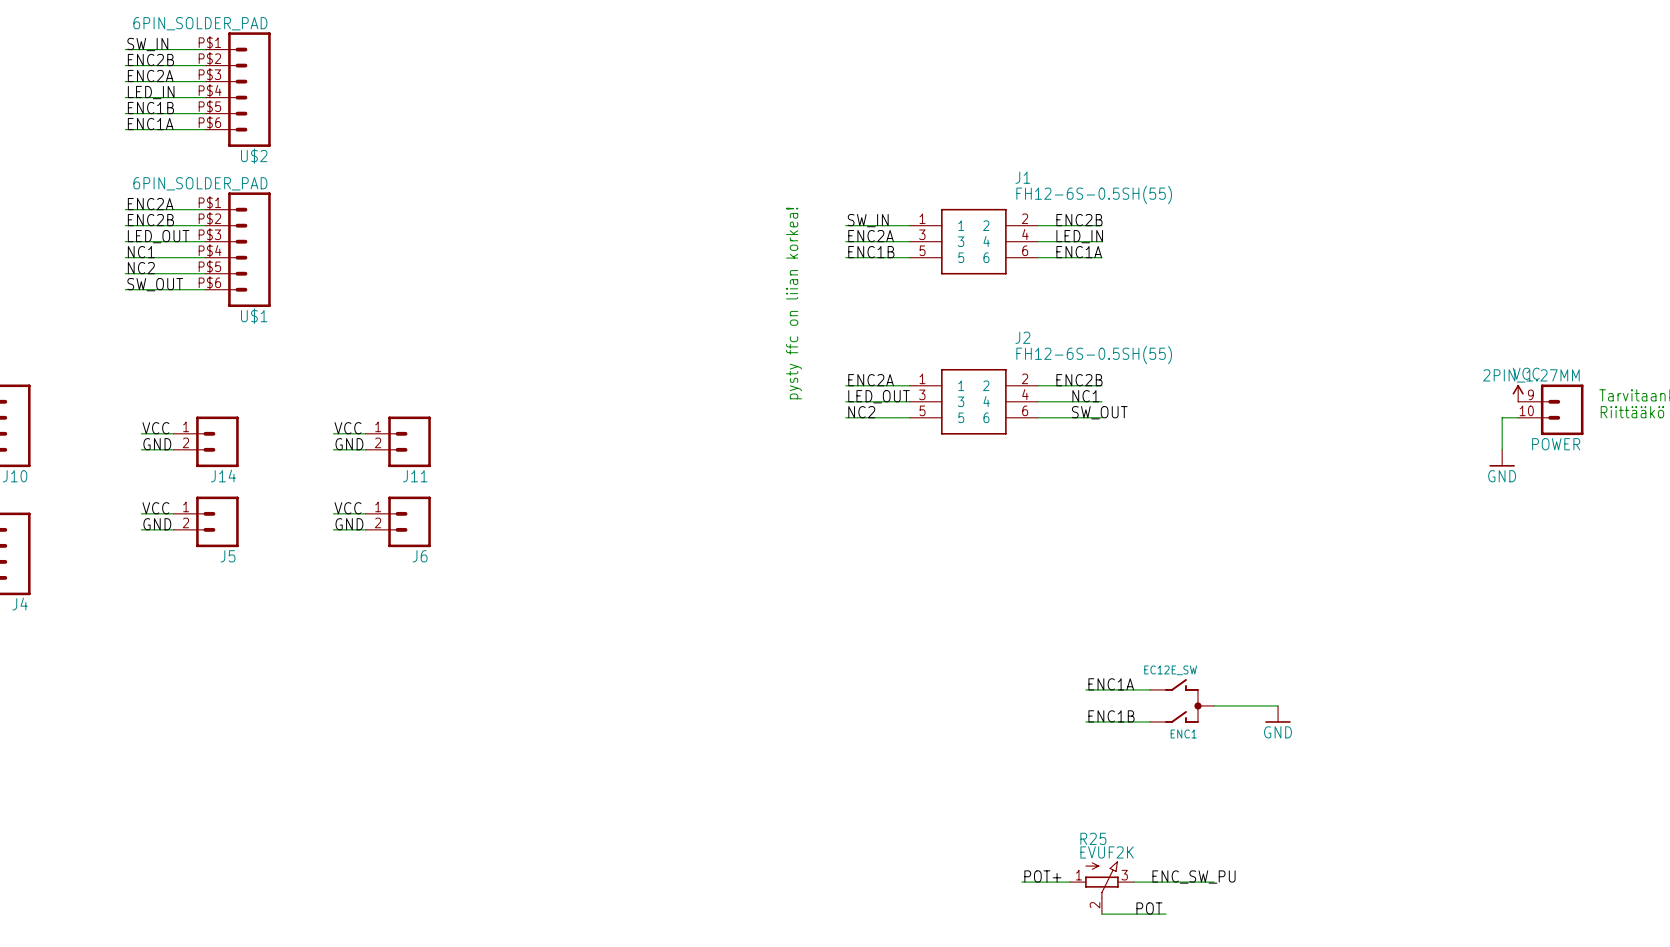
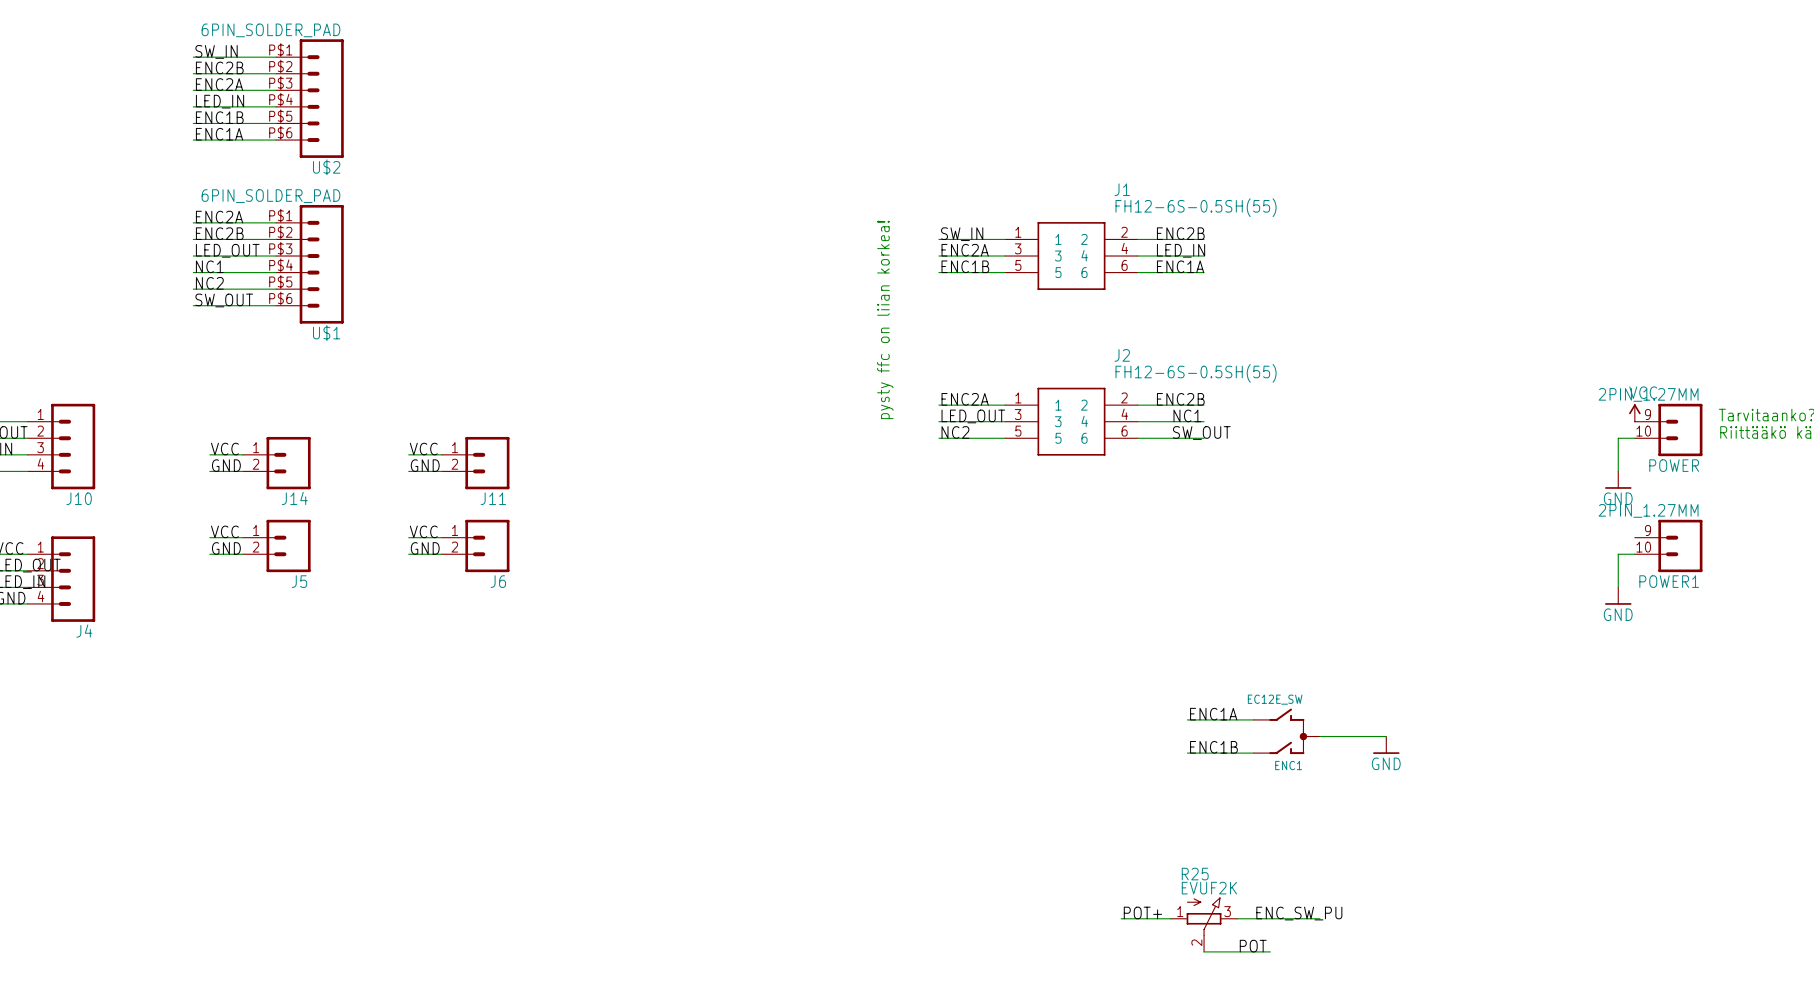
POWER1: none -> 2PIN_1.27MM (1668, 545)
wire: none -> (1634, 554) (1618, 554) (1618, 587)
power symbol: none -> GND (1618, 596)

